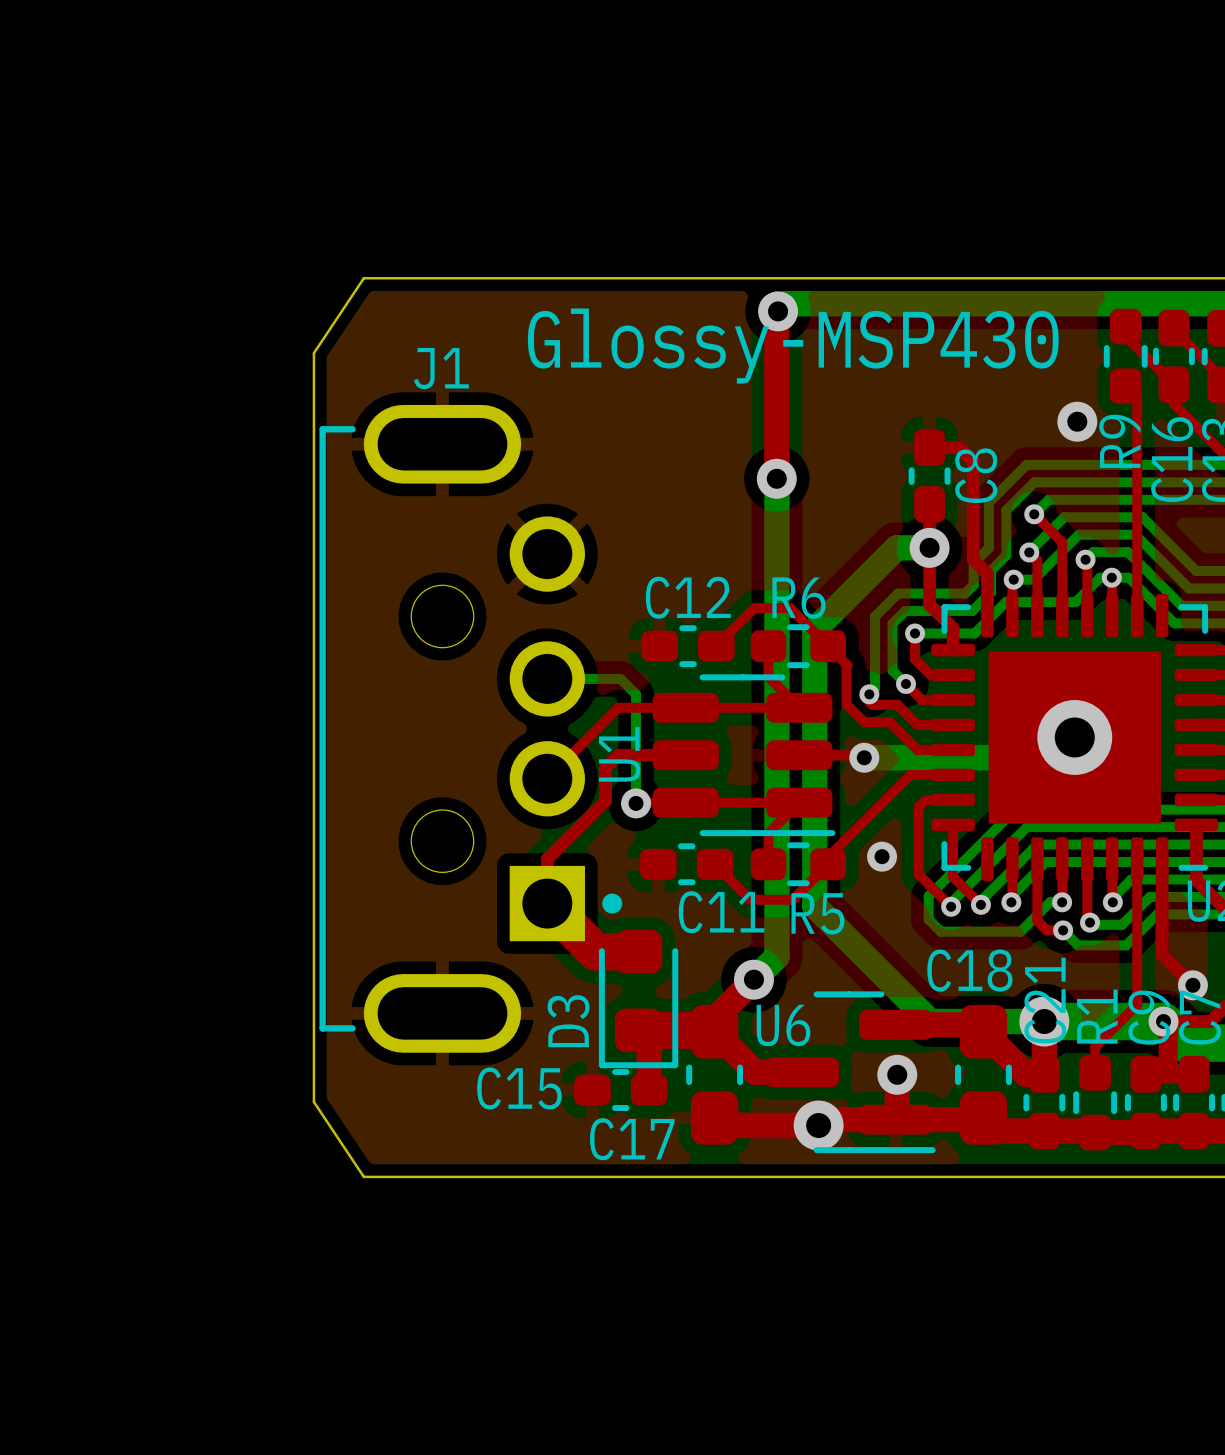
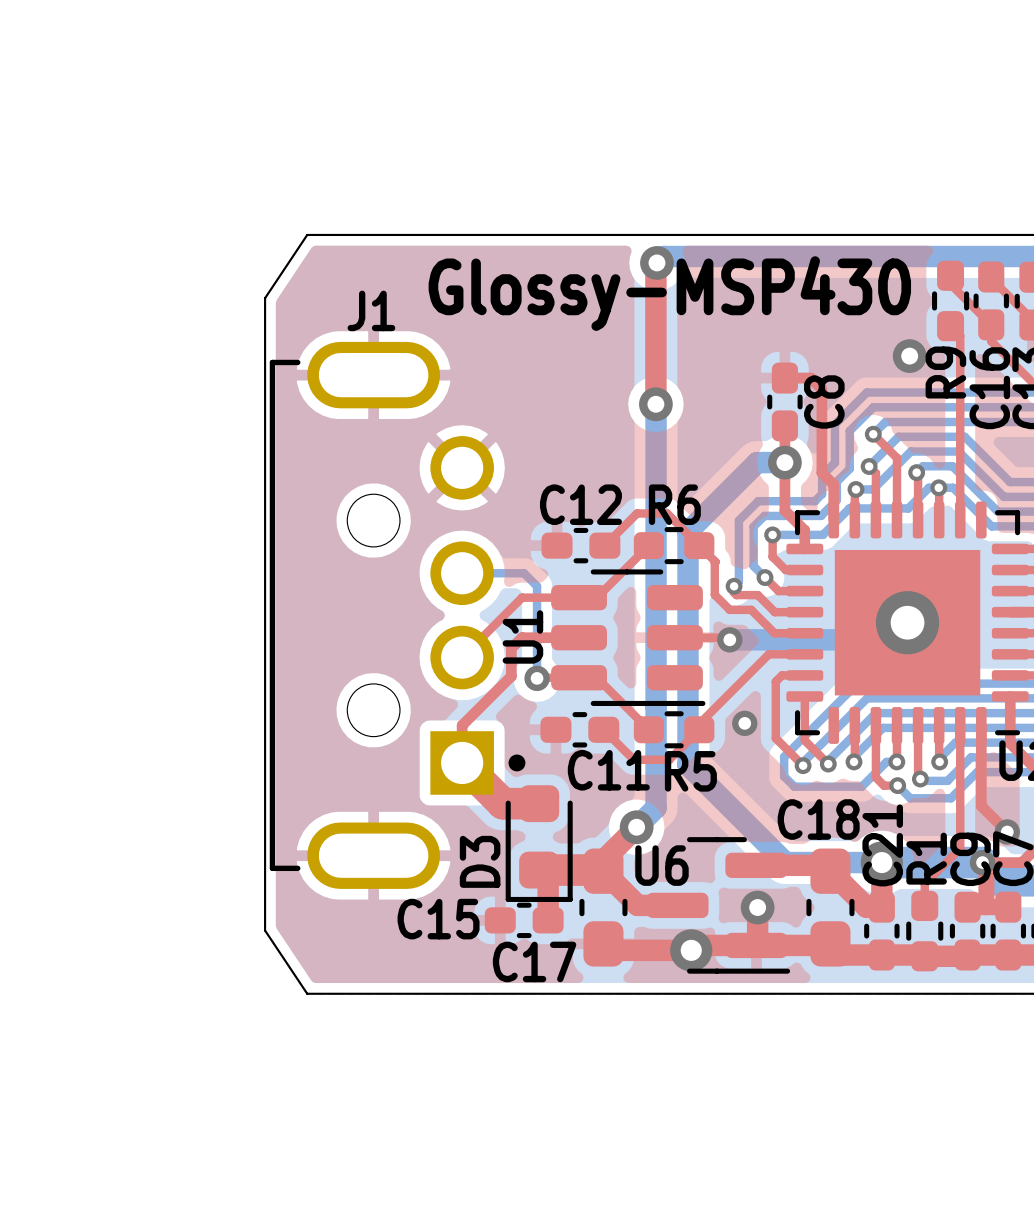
top track: (768, 646) (768, 676) (799, 707) (706, 707) -> (648, 545) (596, 597)
top track: (706, 802) (799, 802) (768, 833) (768, 864) -> (596, 677) (648, 729)

